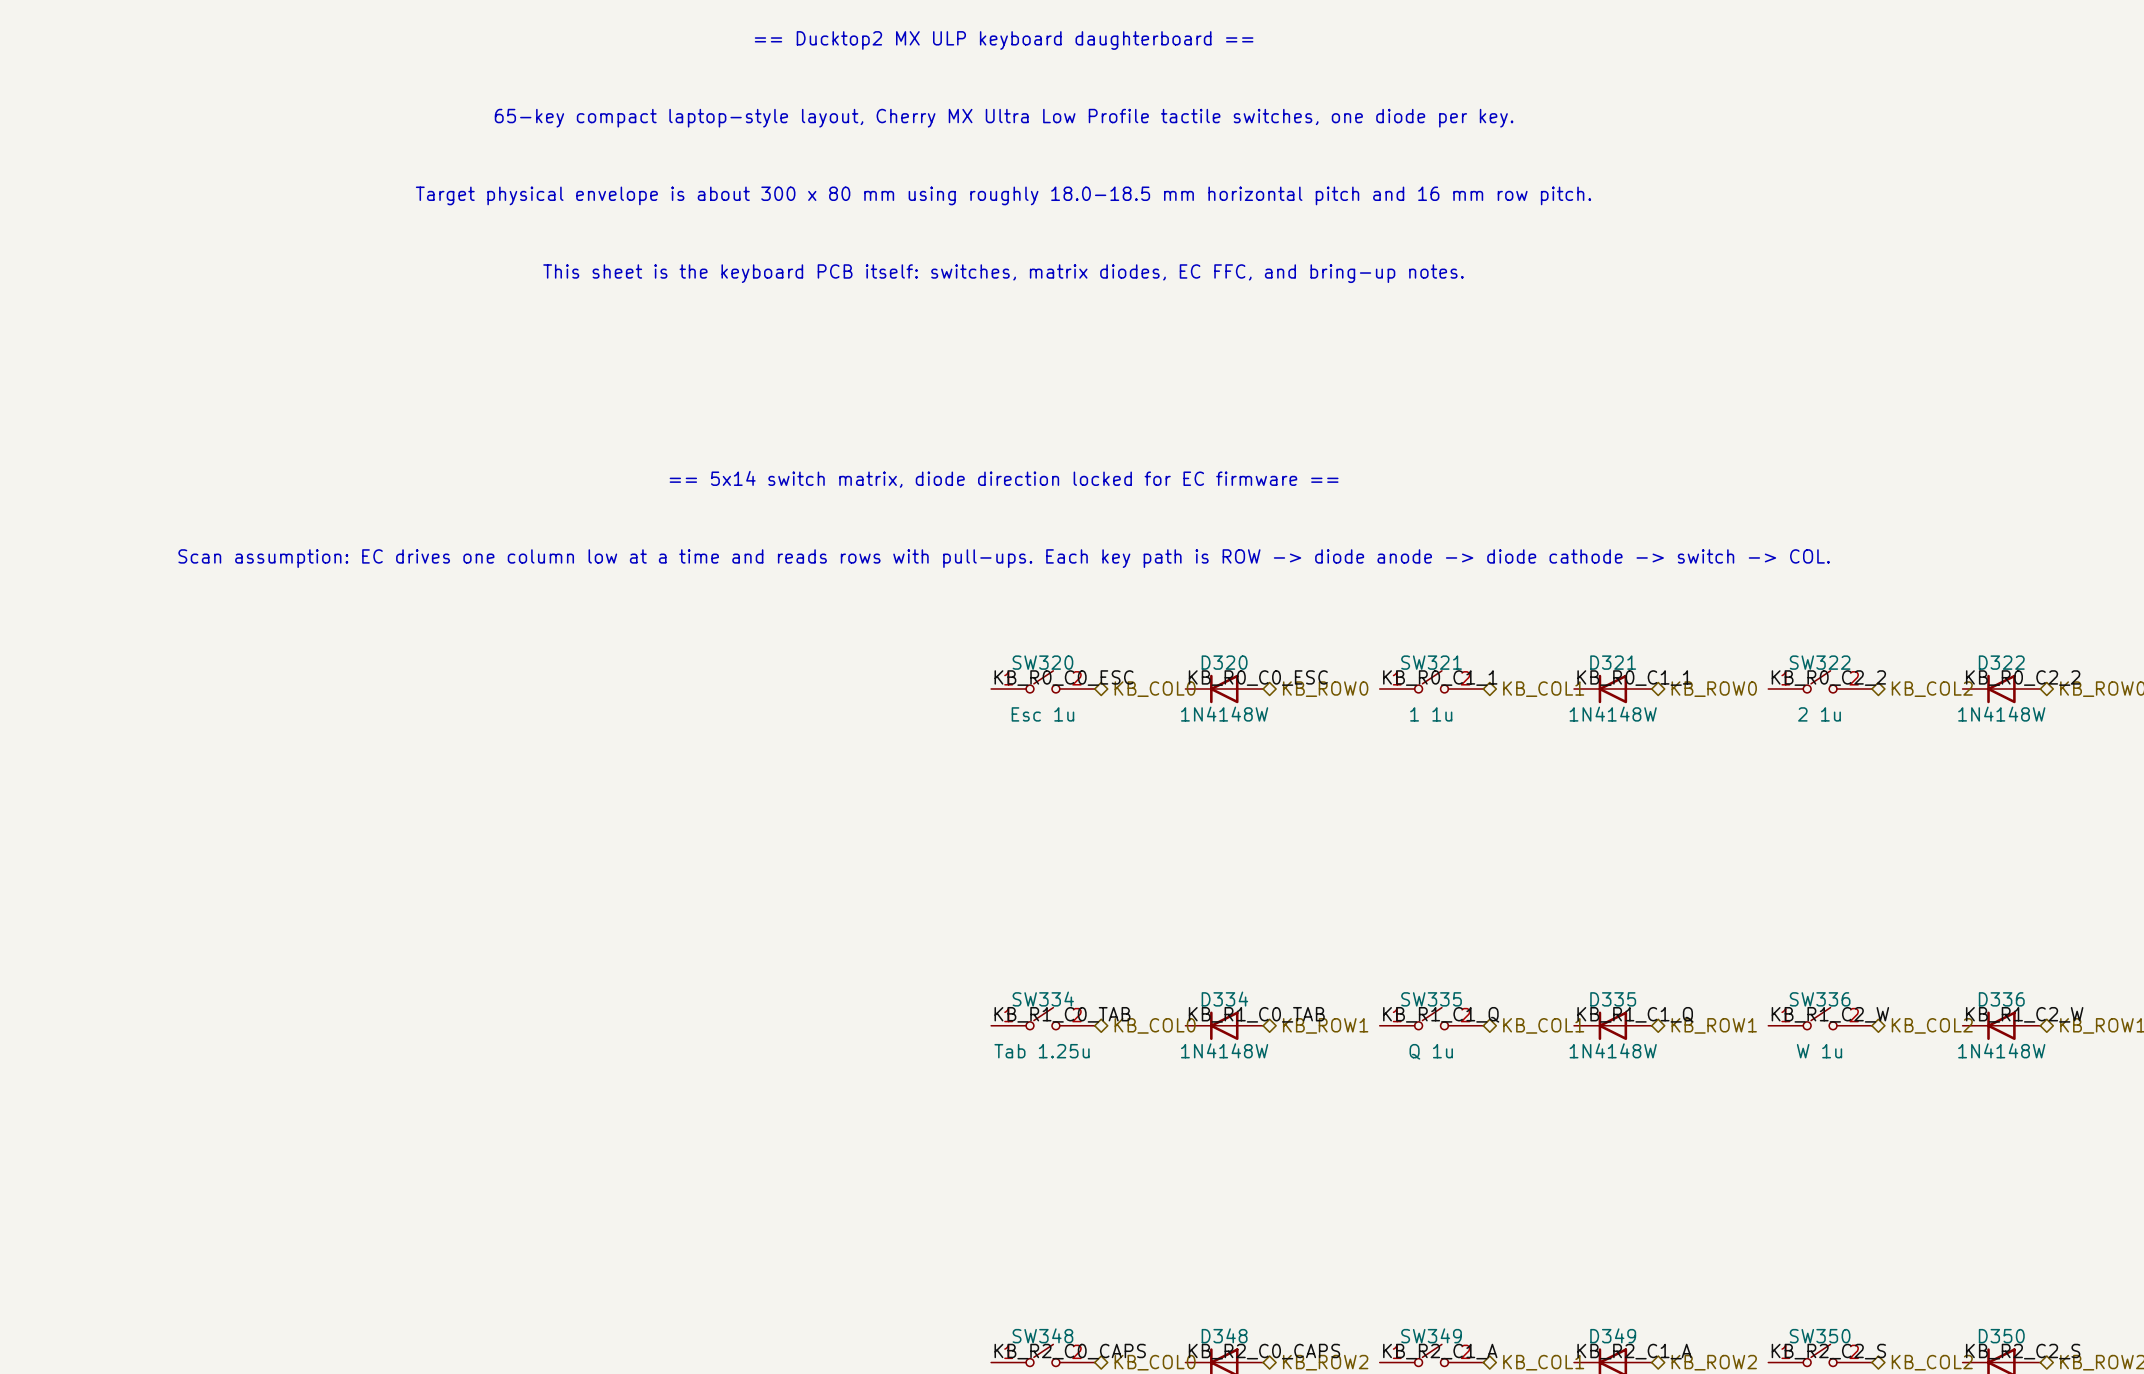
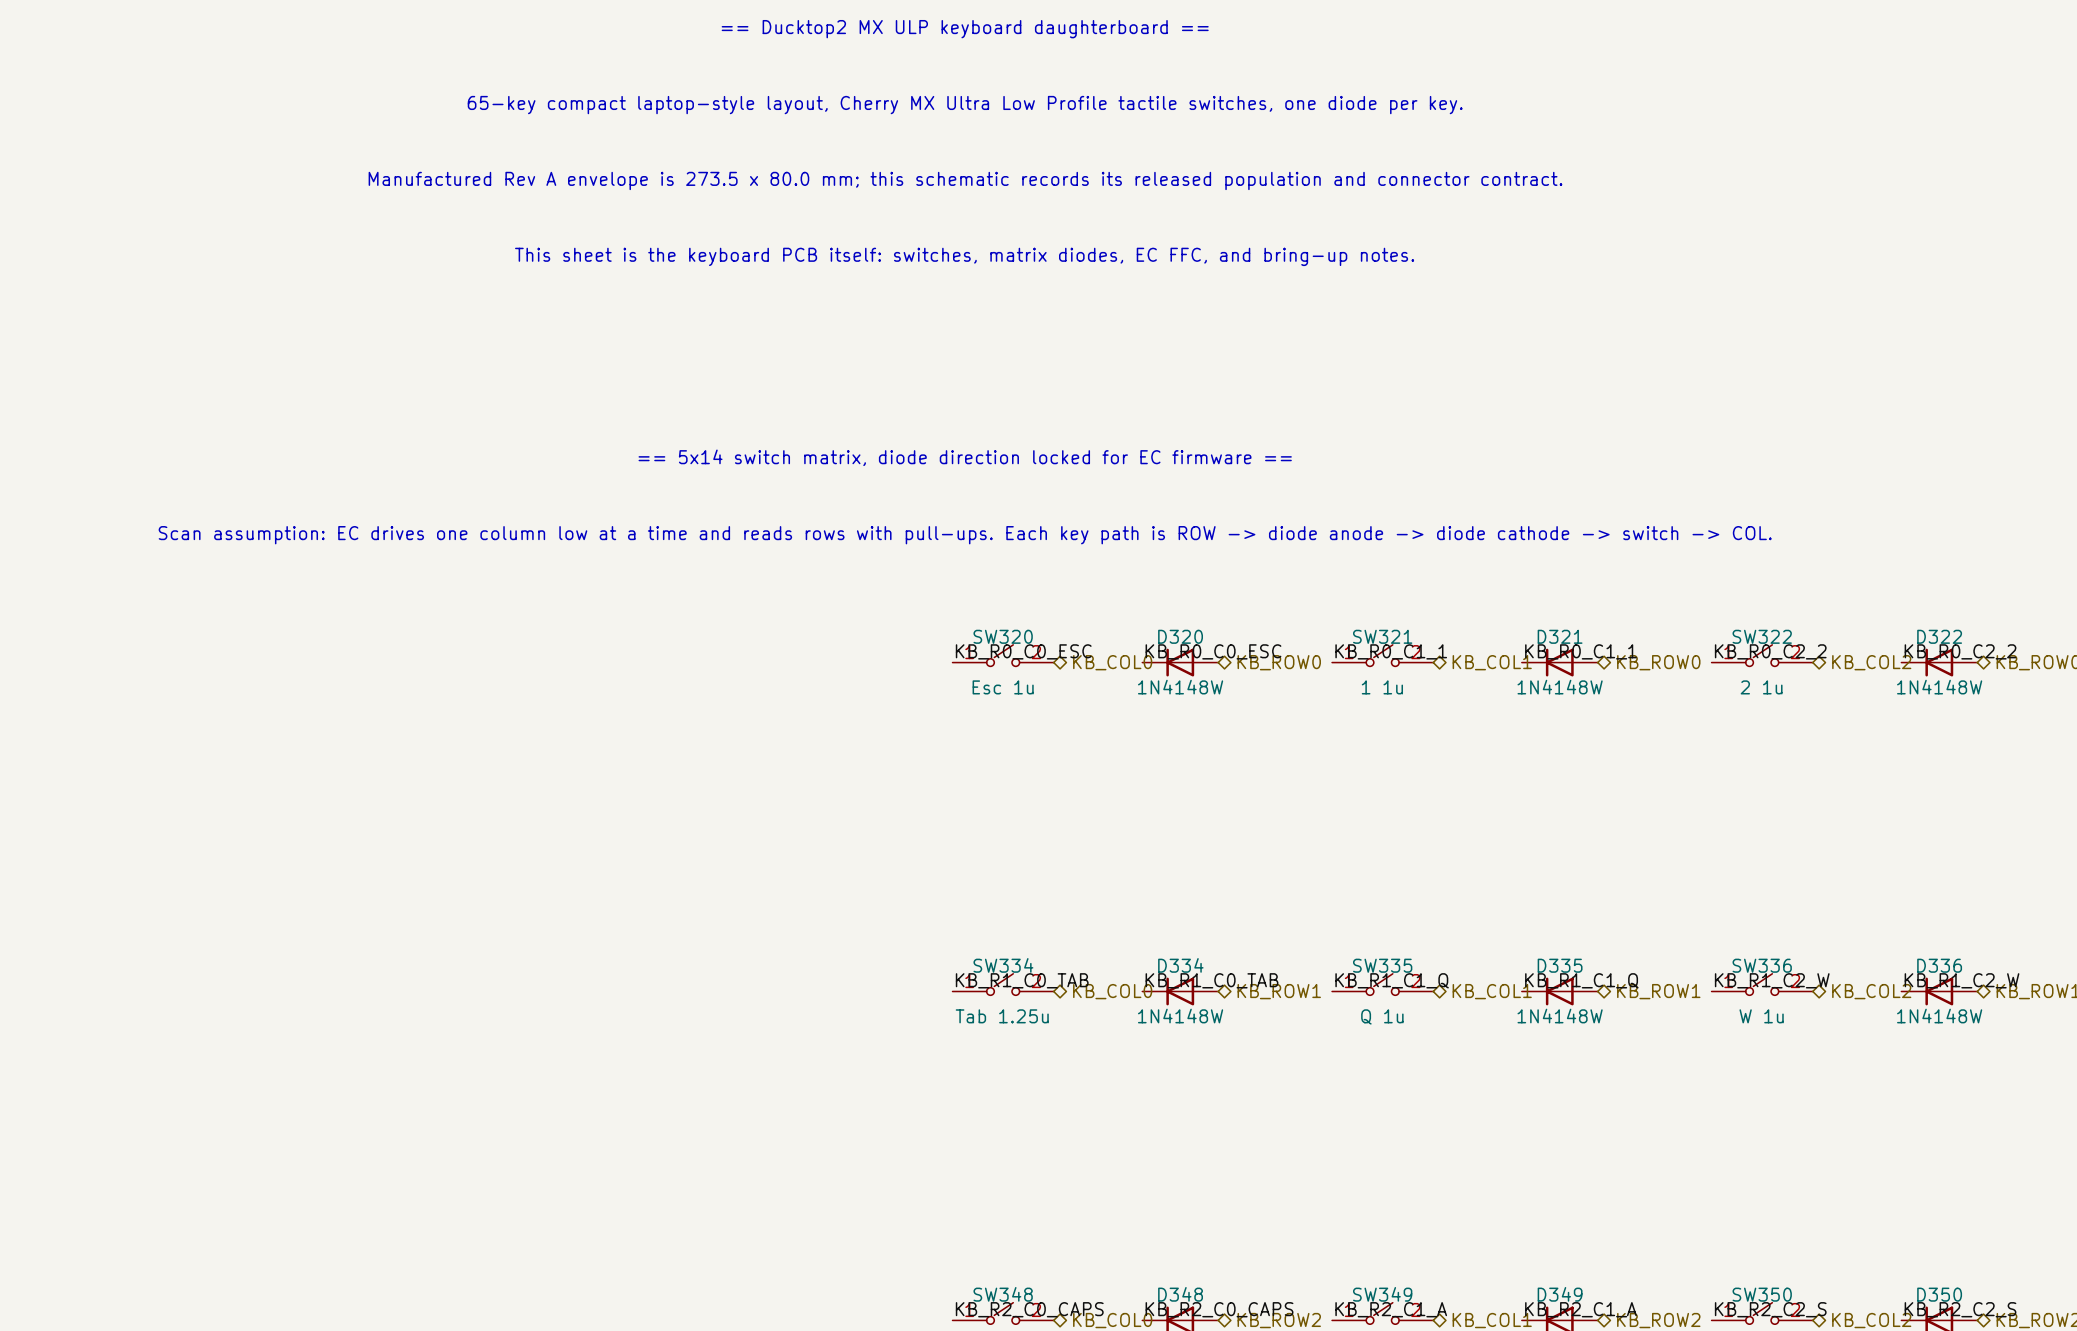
text: Target physical envelope is about 300 x 80 mm using roughly 18.0-18.5 mm horizontal pitch and 16 mm row pitch. (1003, 195) -> Manufactured Rev A envelope is 273.5 x 80.0 mm; this schematic records its released population and connector contract. (965, 180)

